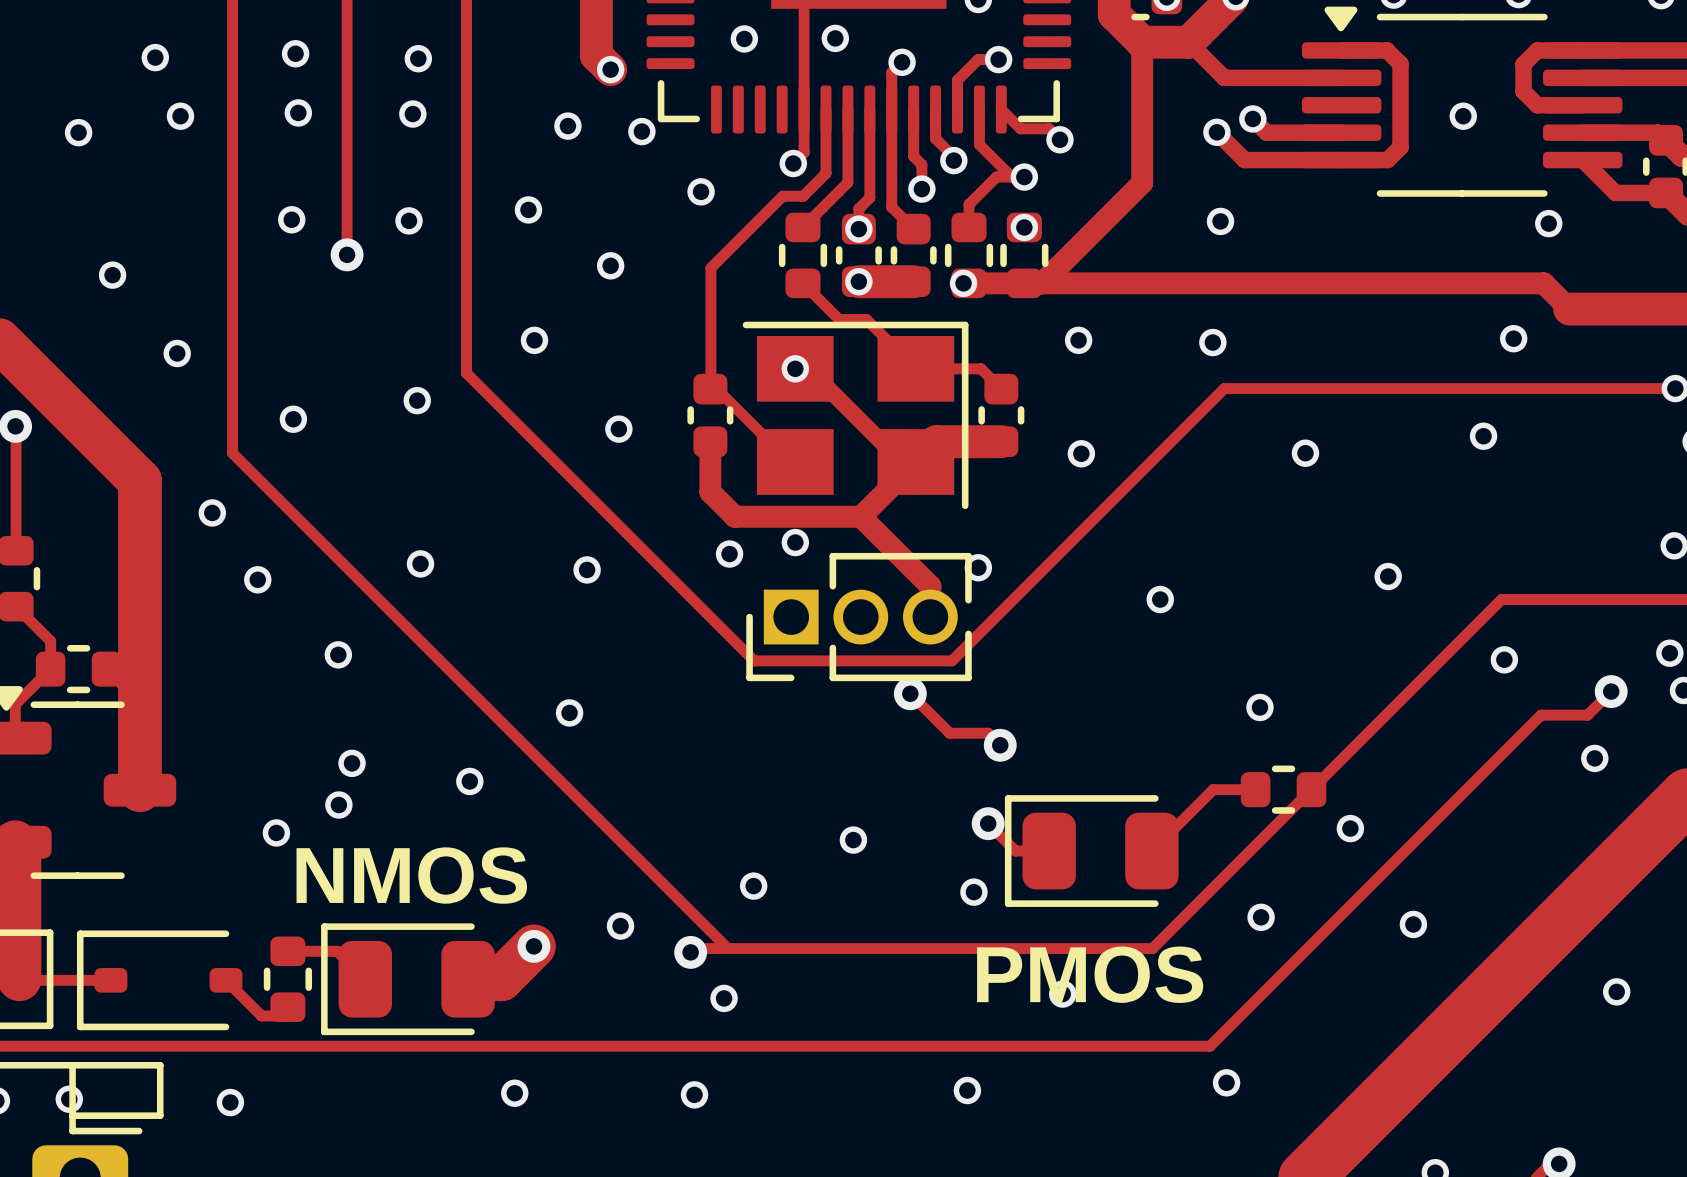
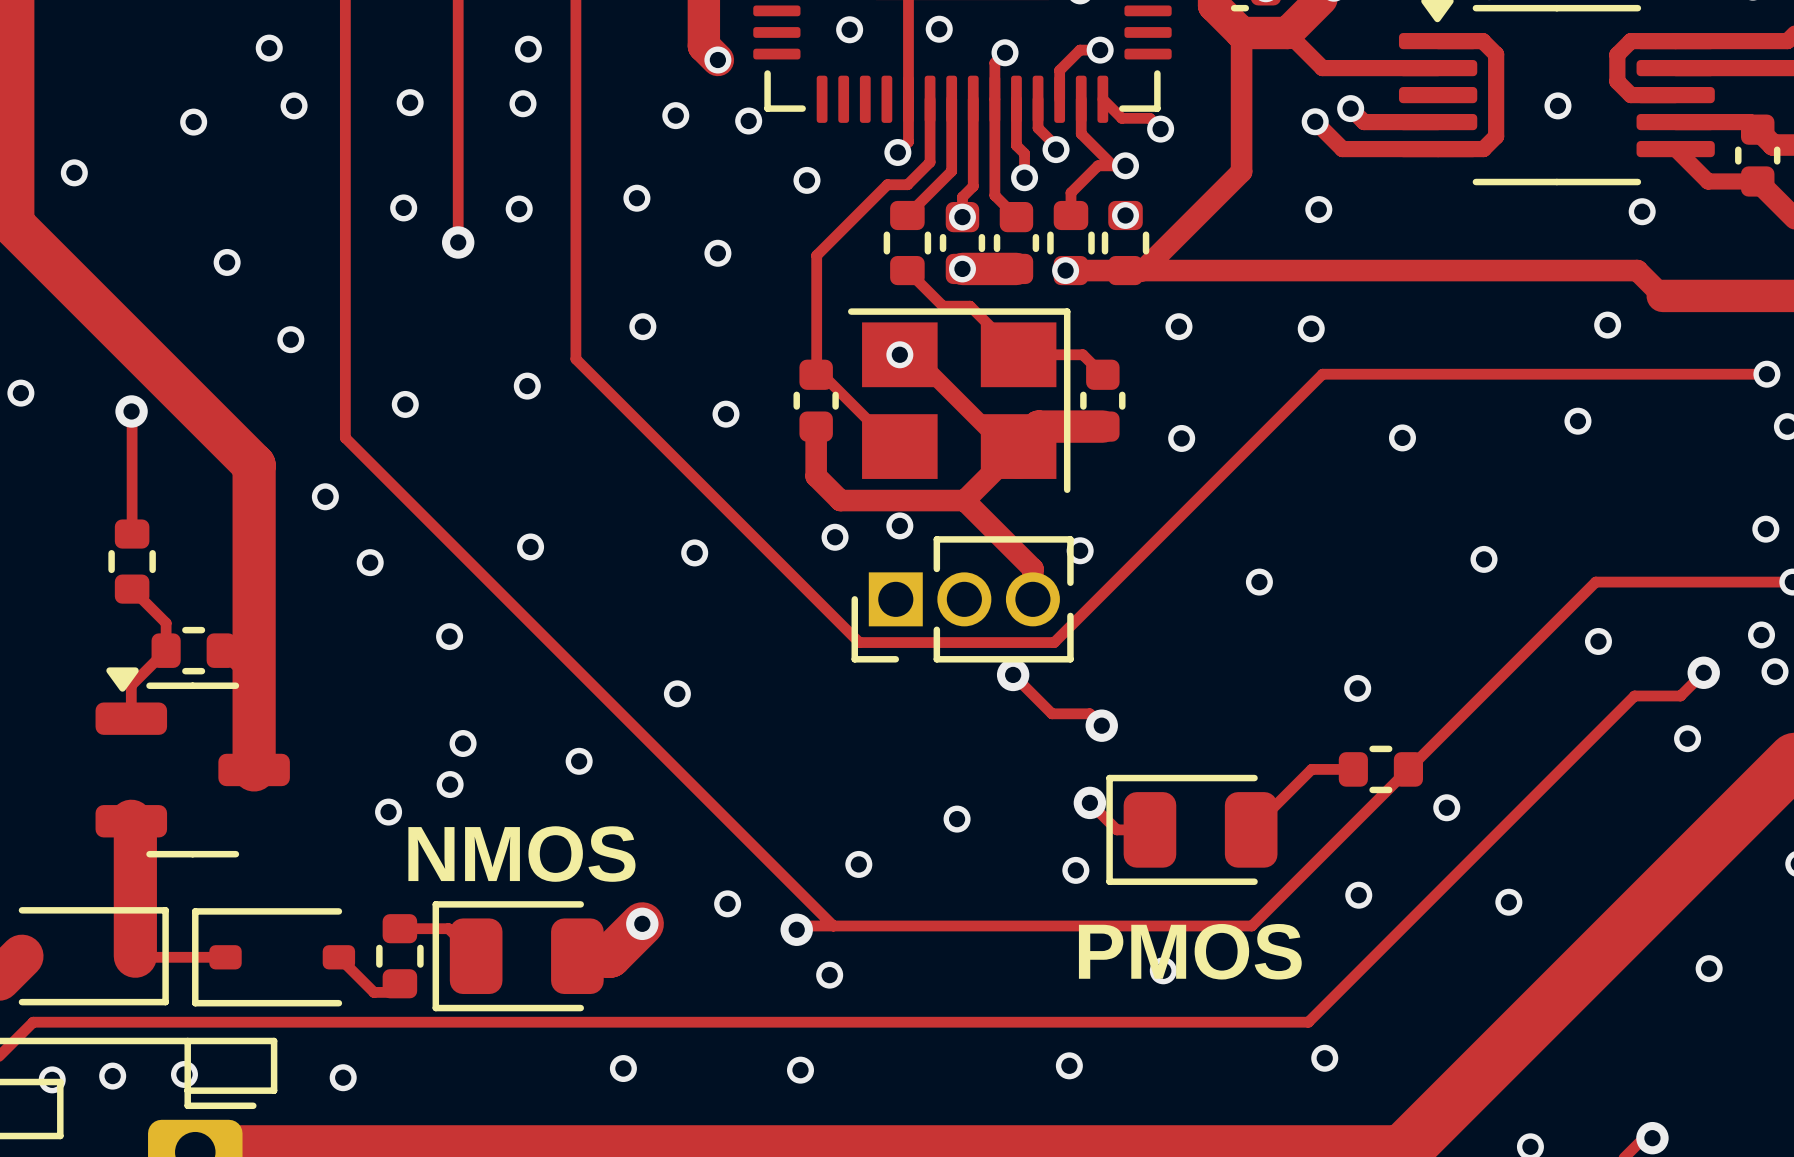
via: (295, 53) -> none

